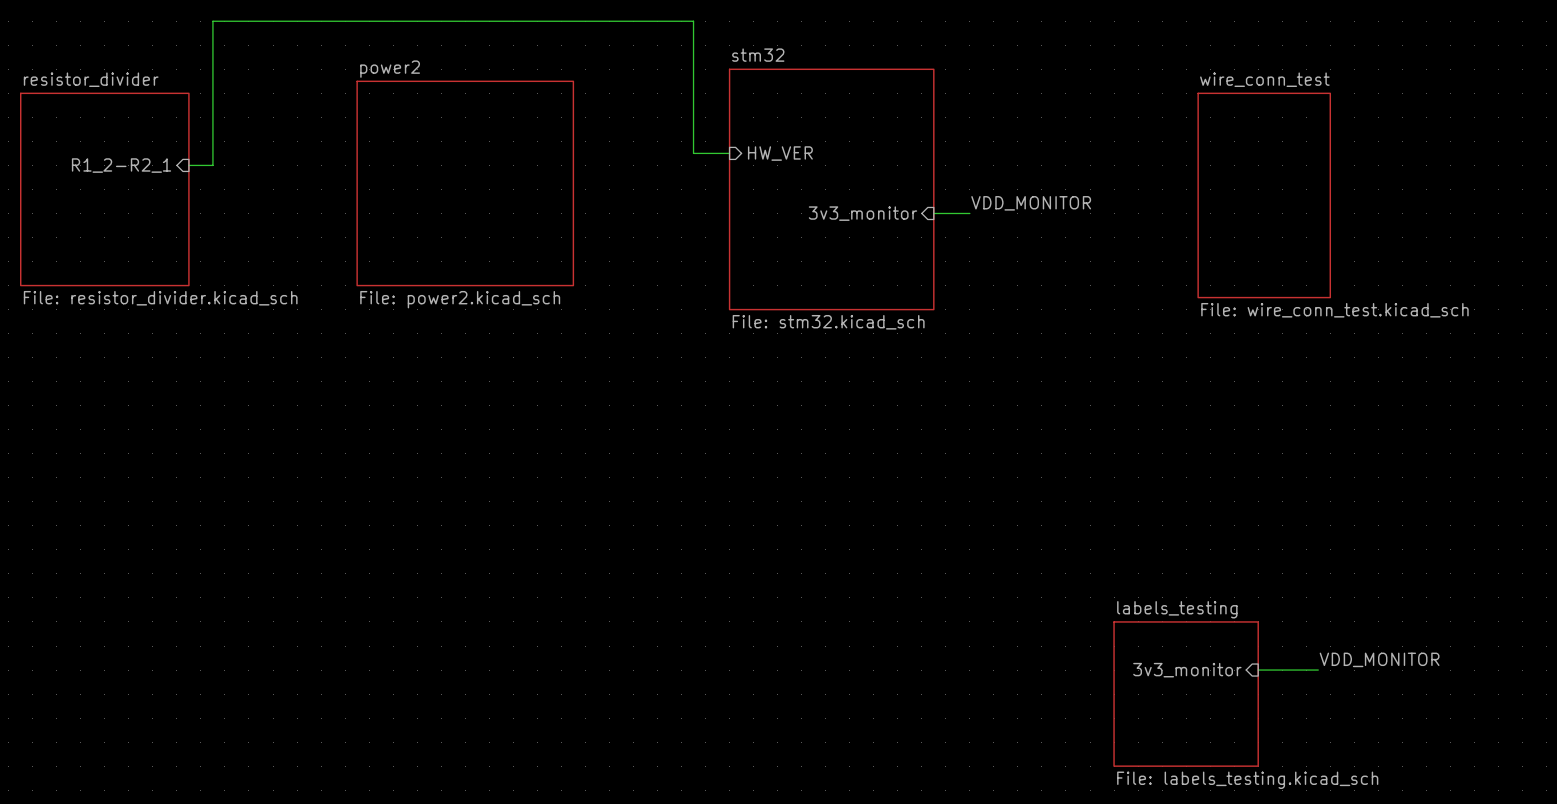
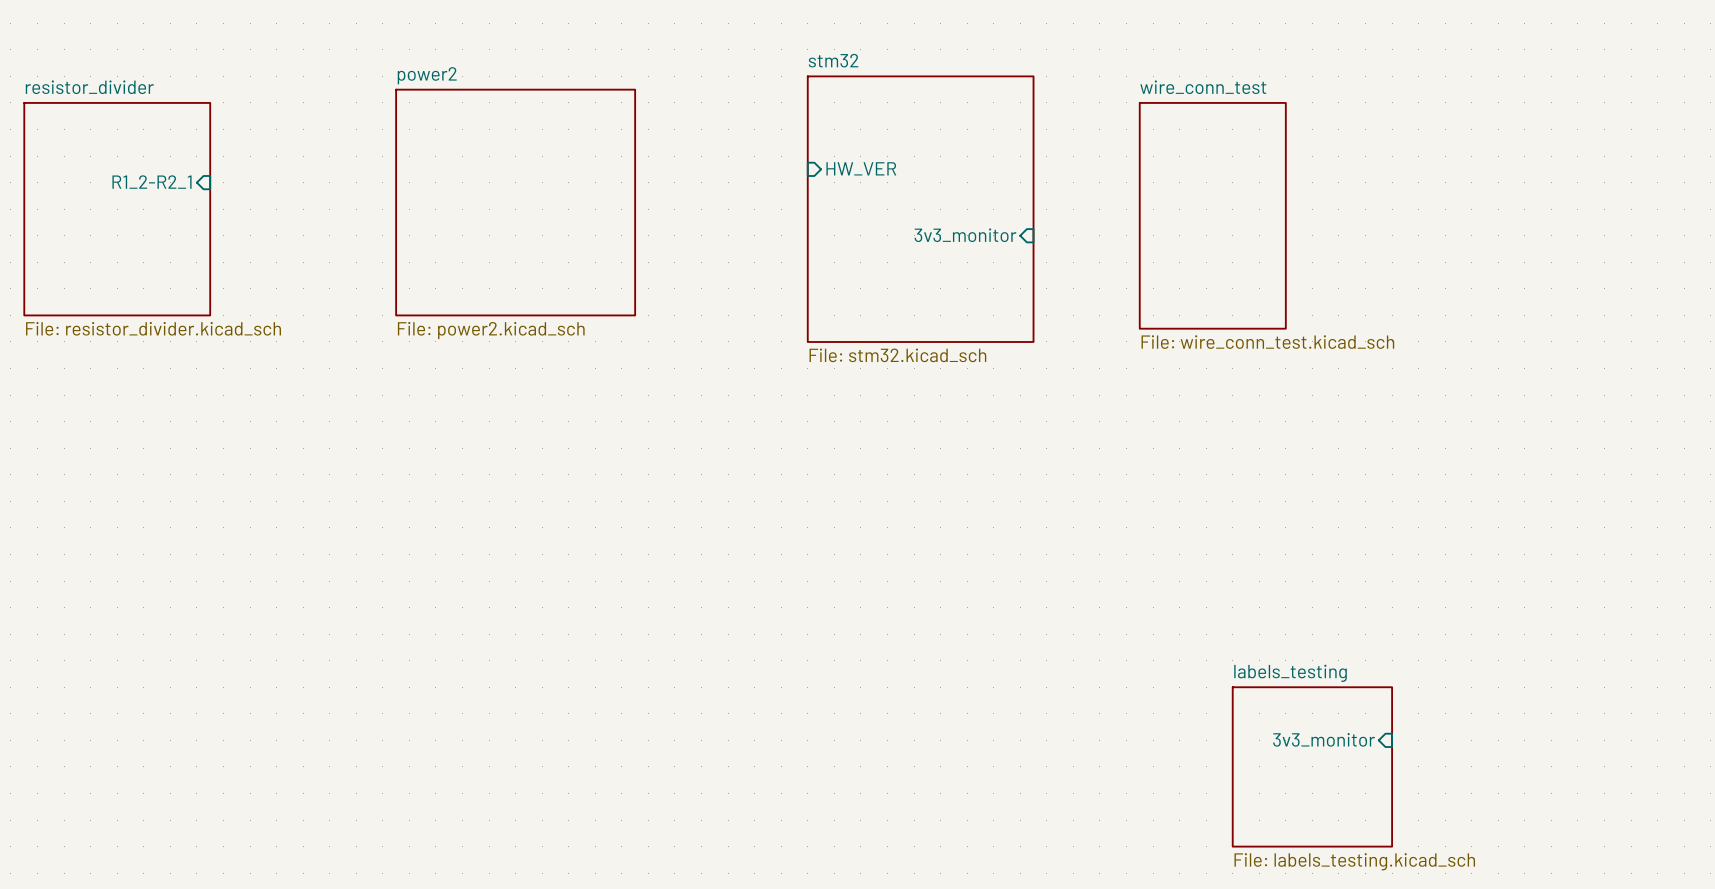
wire: (729, 153) (693, 153) (693, 21) (212, 21) (212, 165) (188, 165) -> none
sheet wire_conn_test position: (1264, 195) -> (1212, 215)
label: VDD_MONITOR (1031, 203) -> none
wire: (933, 213) (969, 213) -> none
label: VDD_MONITOR (1379, 659) -> none
wire: (1258, 670) (1318, 670) -> none

